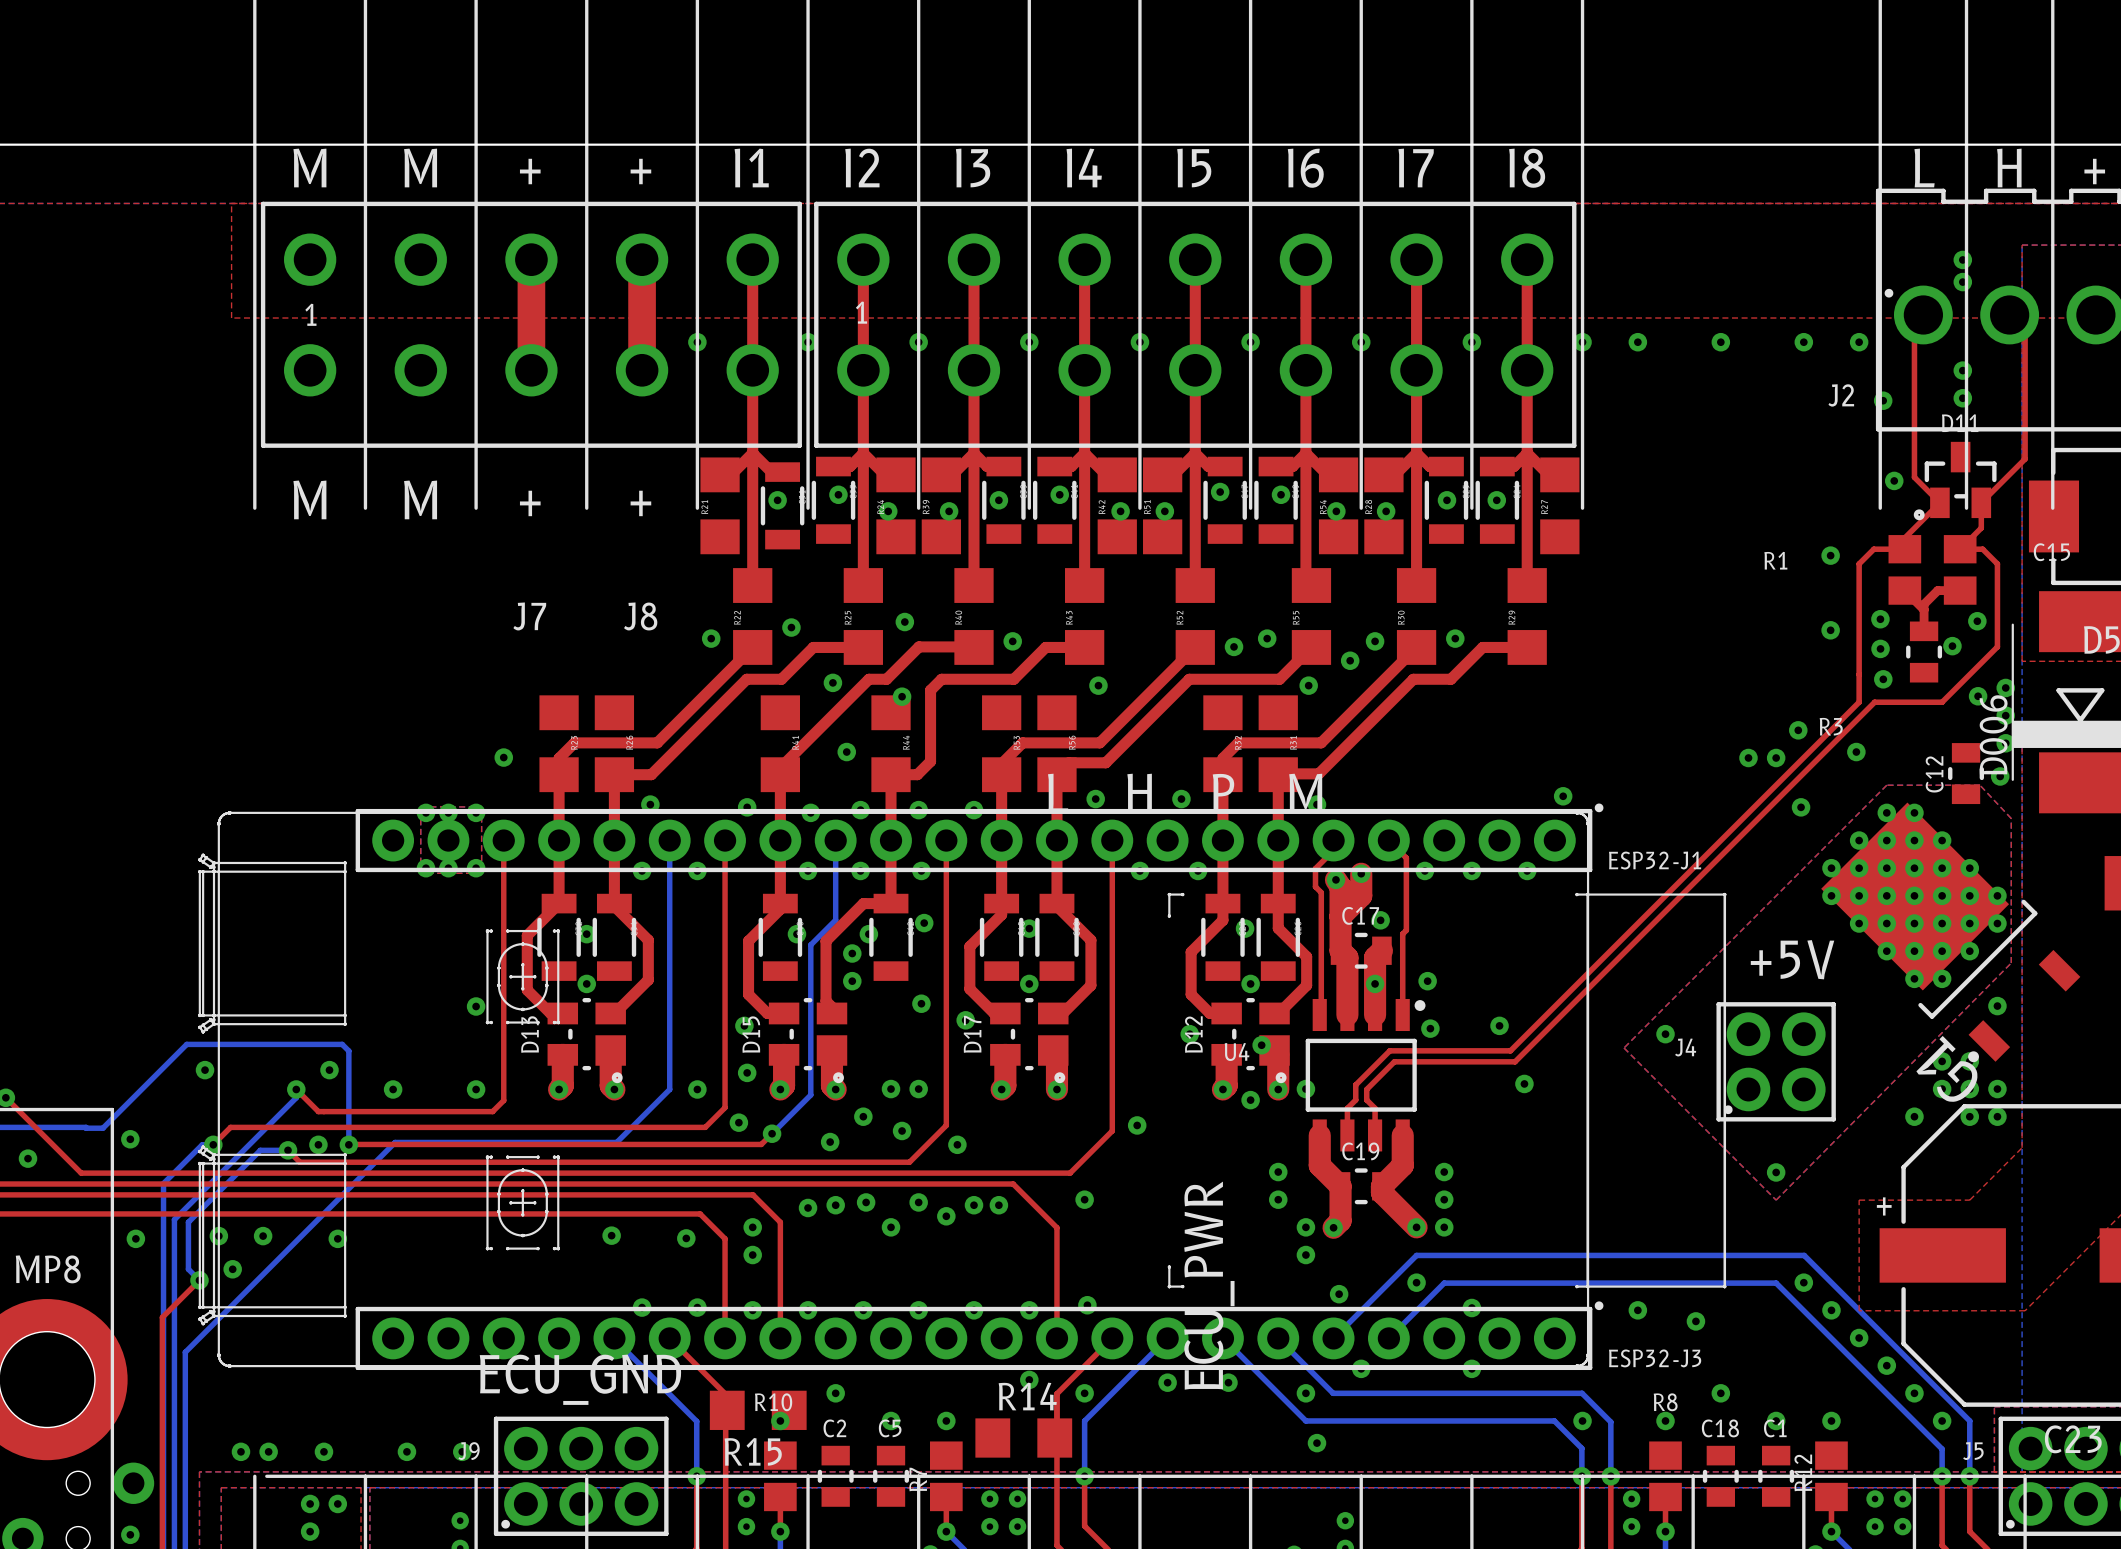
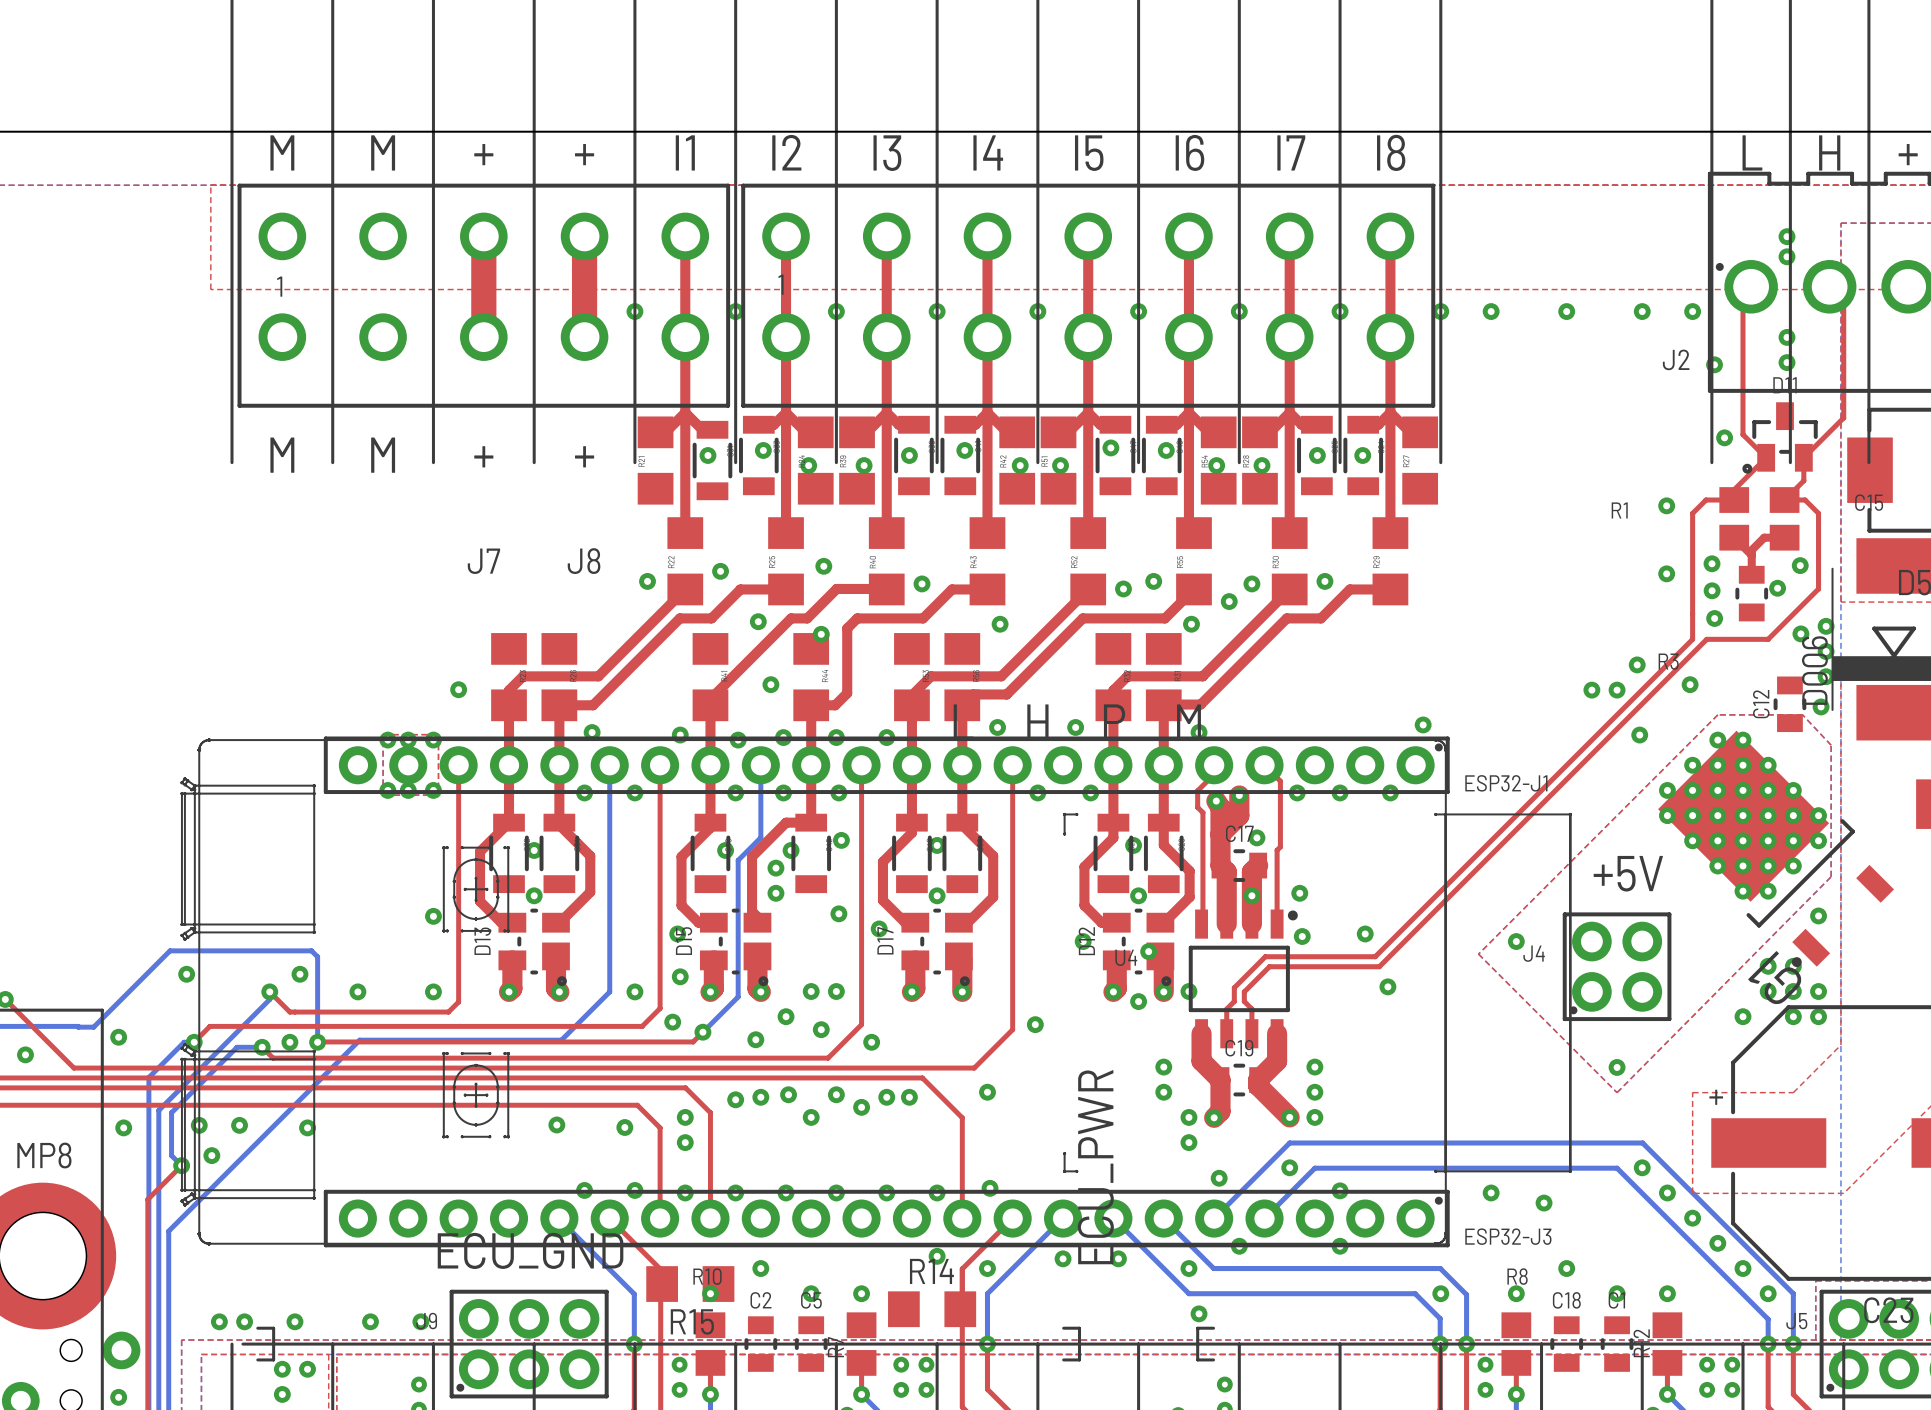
ESP32-J1 footprint: [355, 803, 1604, 873] -> [323, 736, 1450, 795]
ESP32-J3 footprint: [355, 1301, 1604, 1371] -> [323, 1189, 1450, 1248]
line: none -> (257, 1328) (273, 1328) (273, 1359) (257, 1359)
line: none -> (1063, 1328) (1079, 1328) (1079, 1359) (1063, 1359)
line: none -> (1213, 1328) (1197, 1328) (1197, 1359) (1213, 1359)

